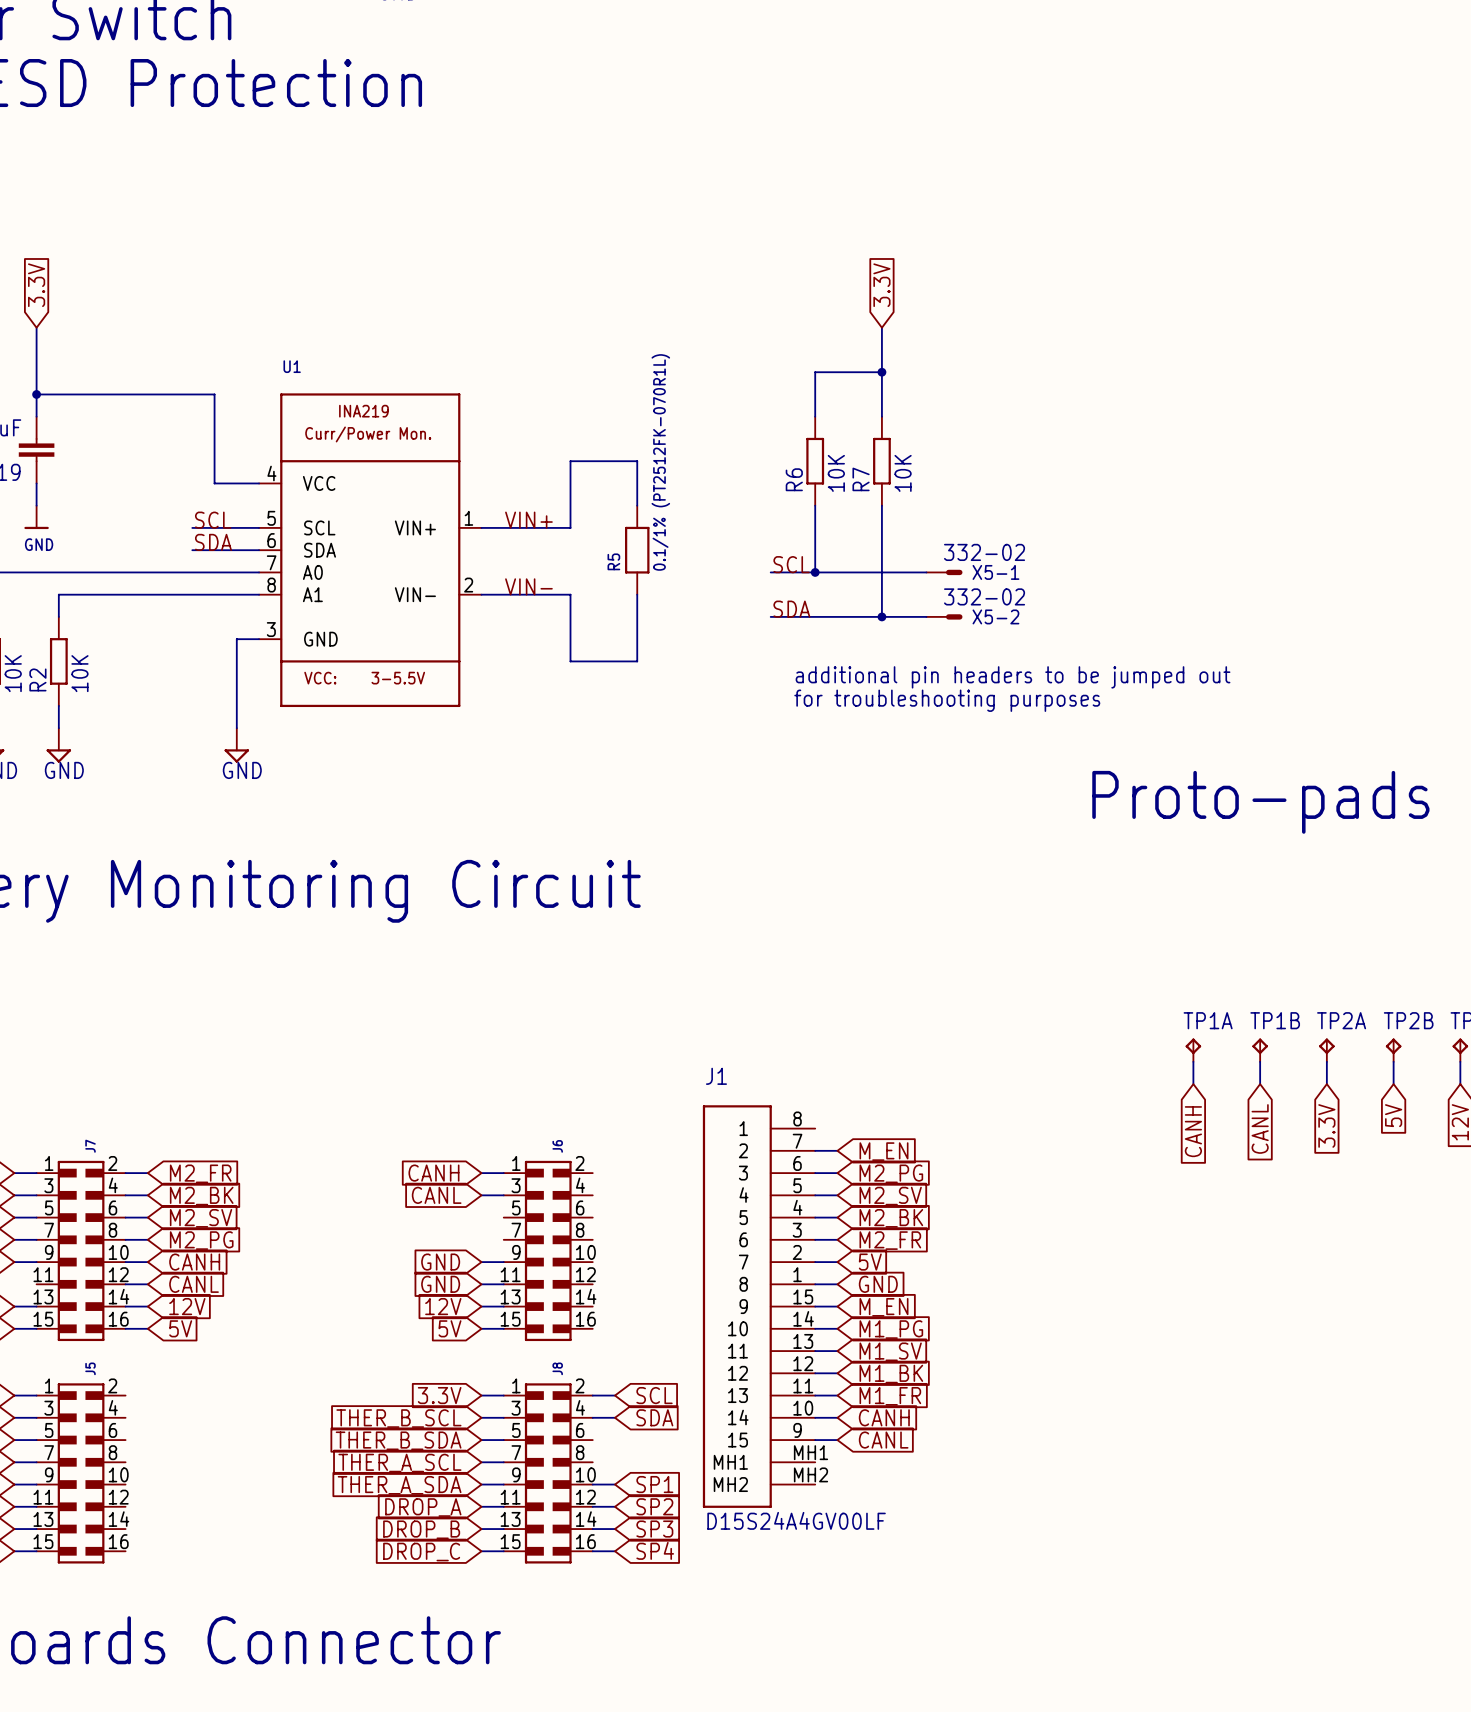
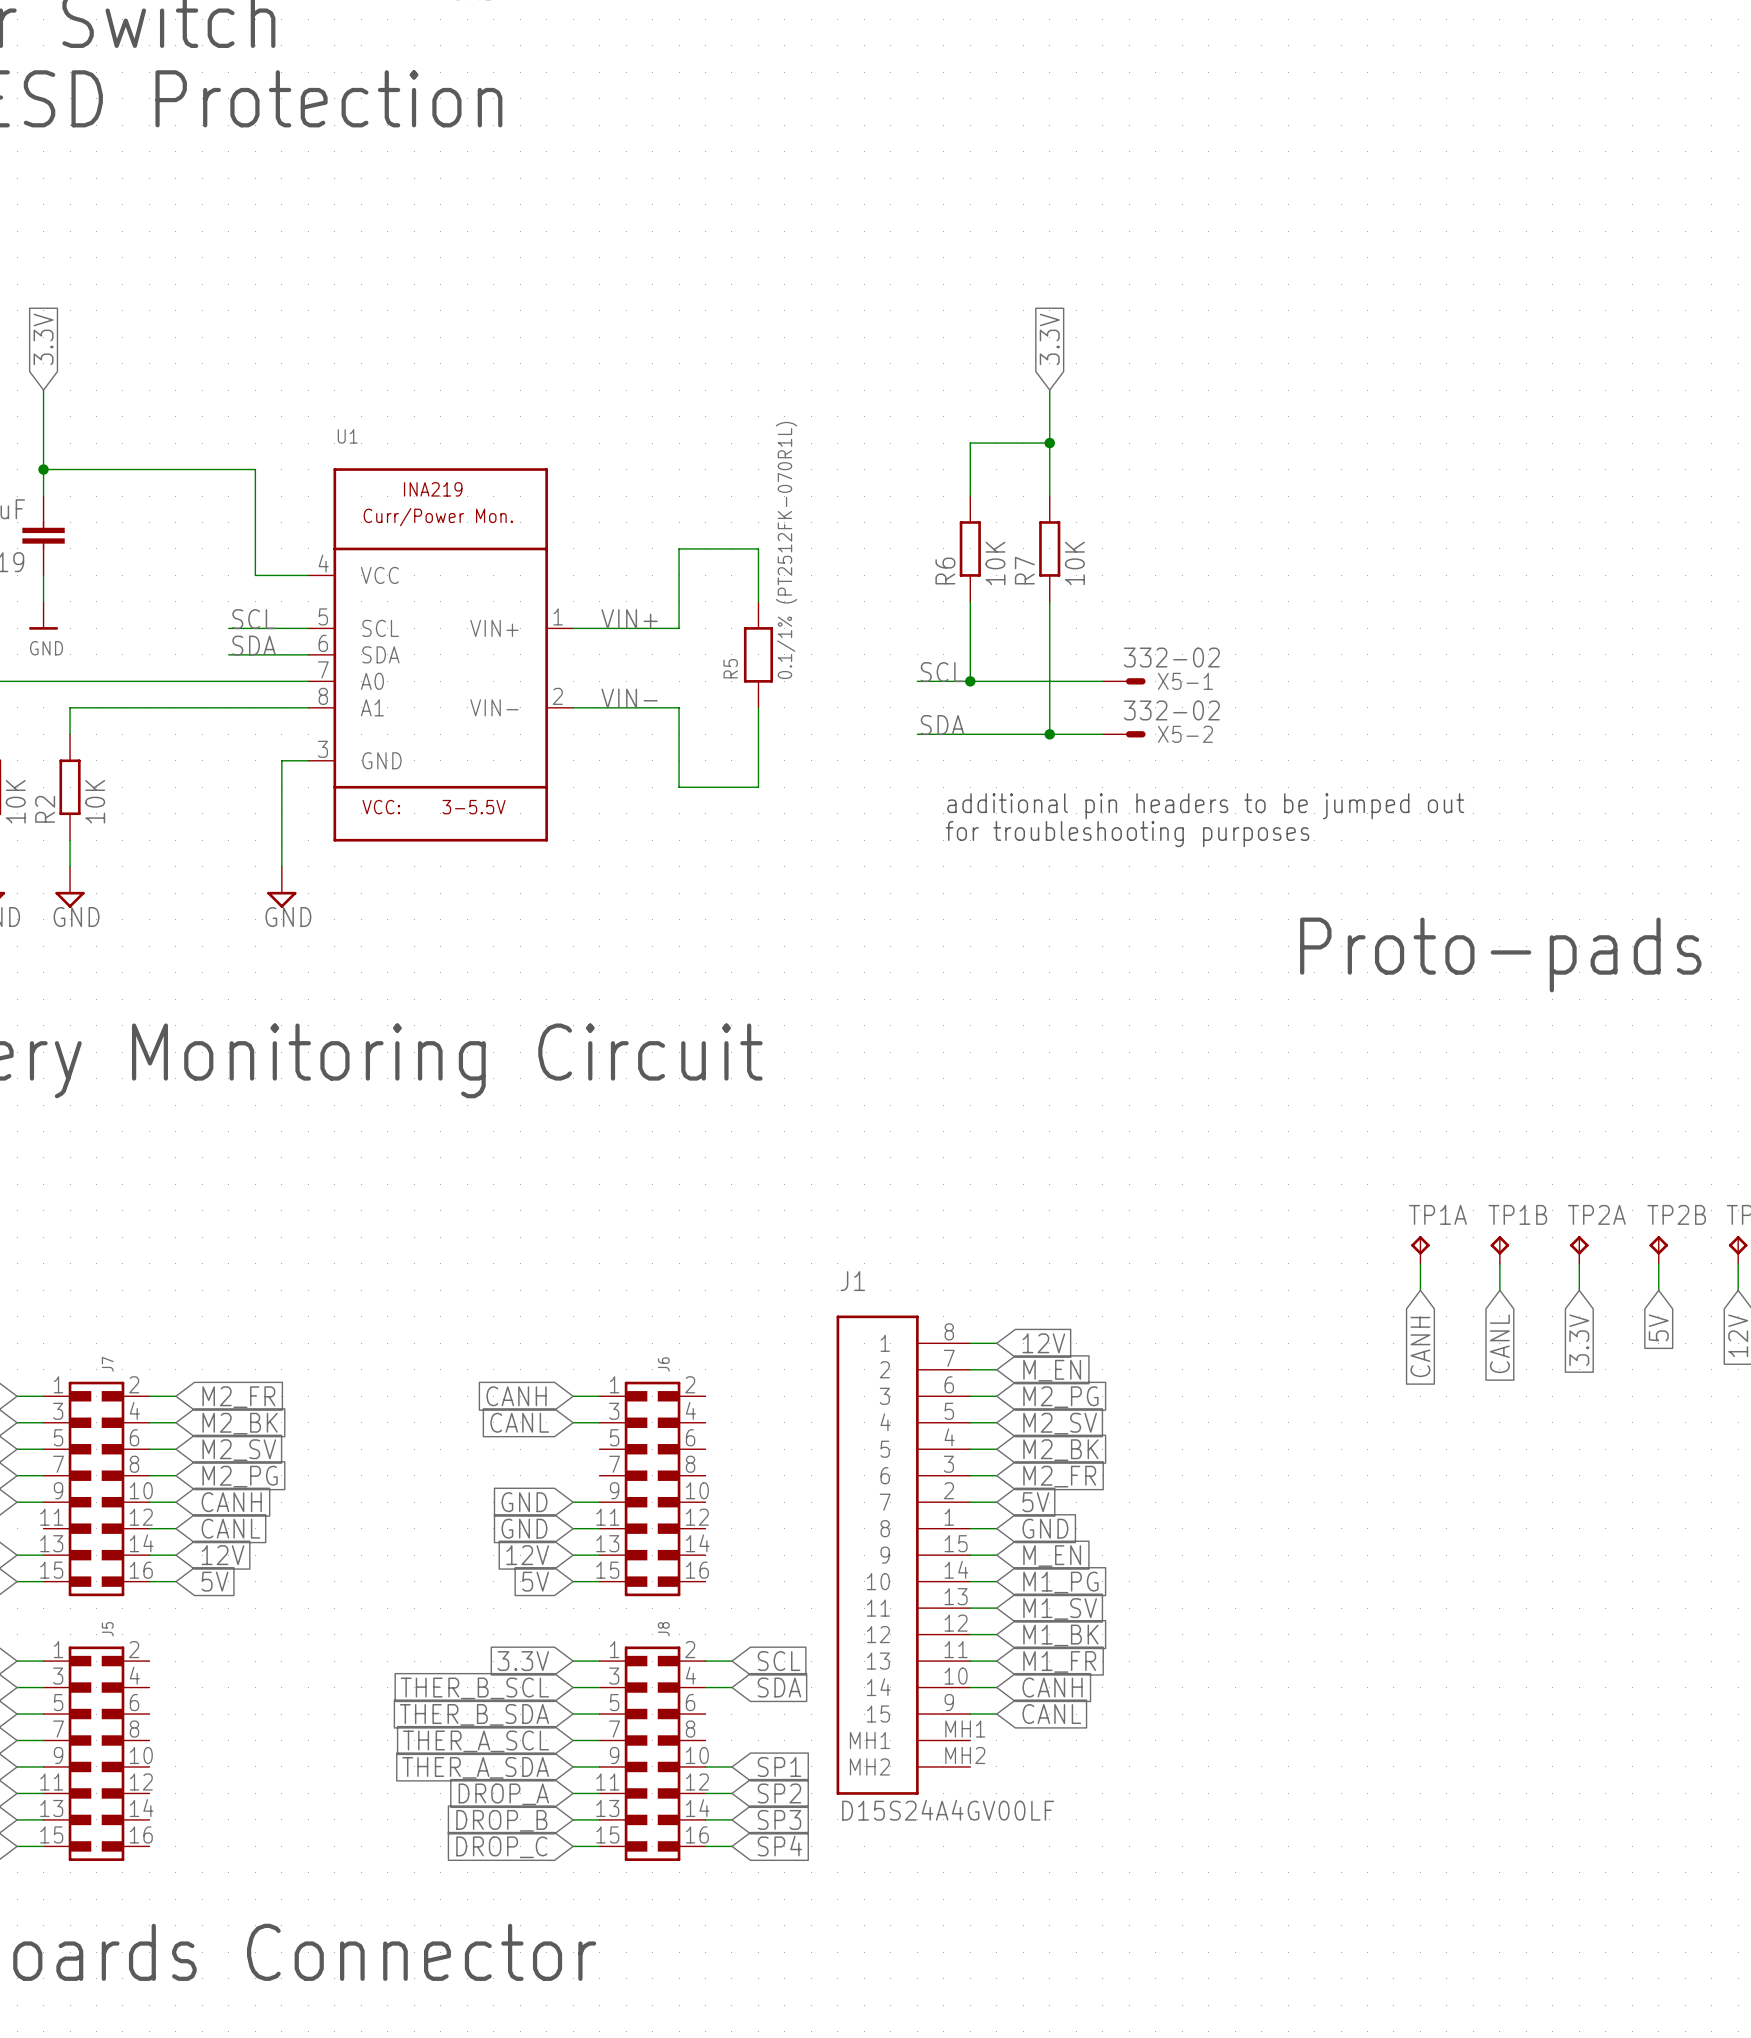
wire: none -> (970, 1343) (996, 1343)
global label: none -> 12V (1043, 1343)

